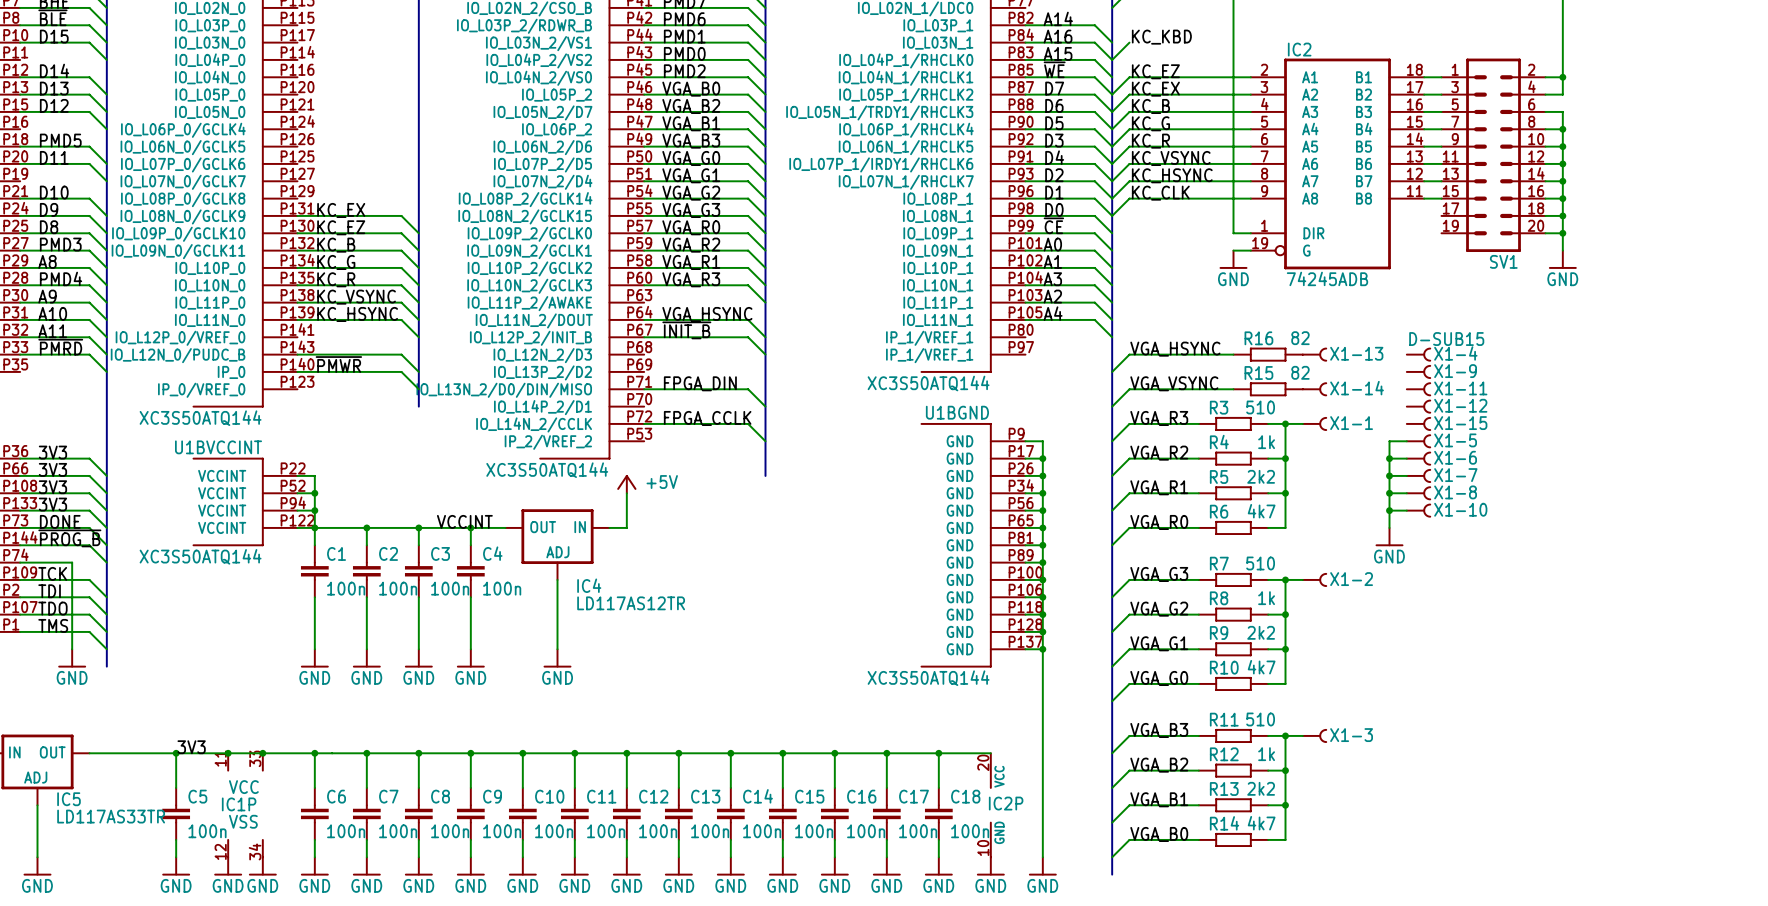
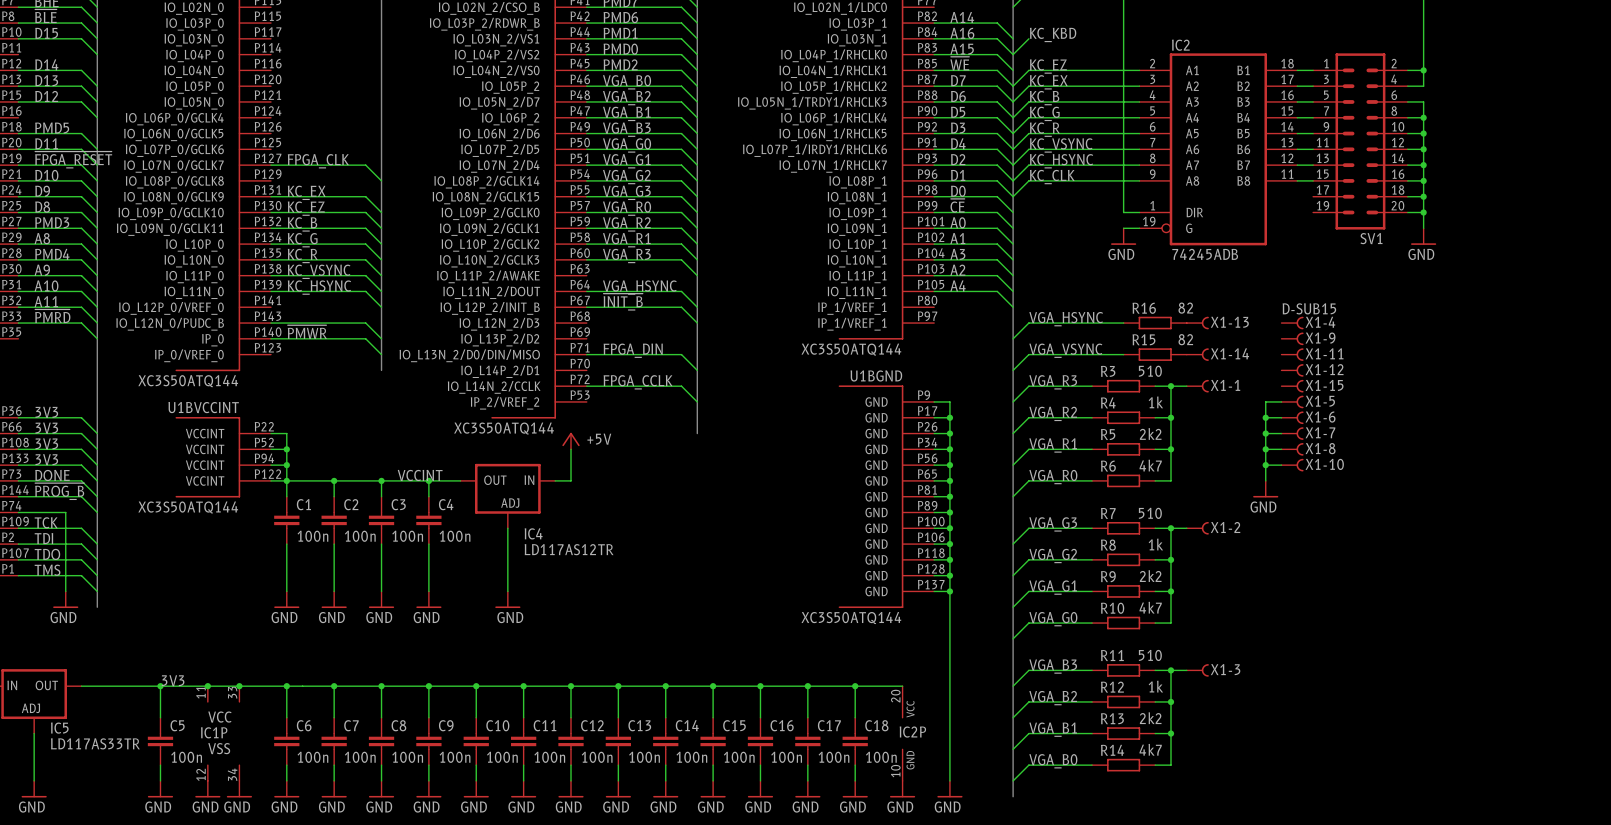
label: none -> ~{FPGA_RESET} (73, 159)
label: none -> FPGA_CLK (318, 161)
wire: none -> (18, 165) (81, 165) (97, 180)
wire: none -> (271, 165) (365, 165) (381, 180)

